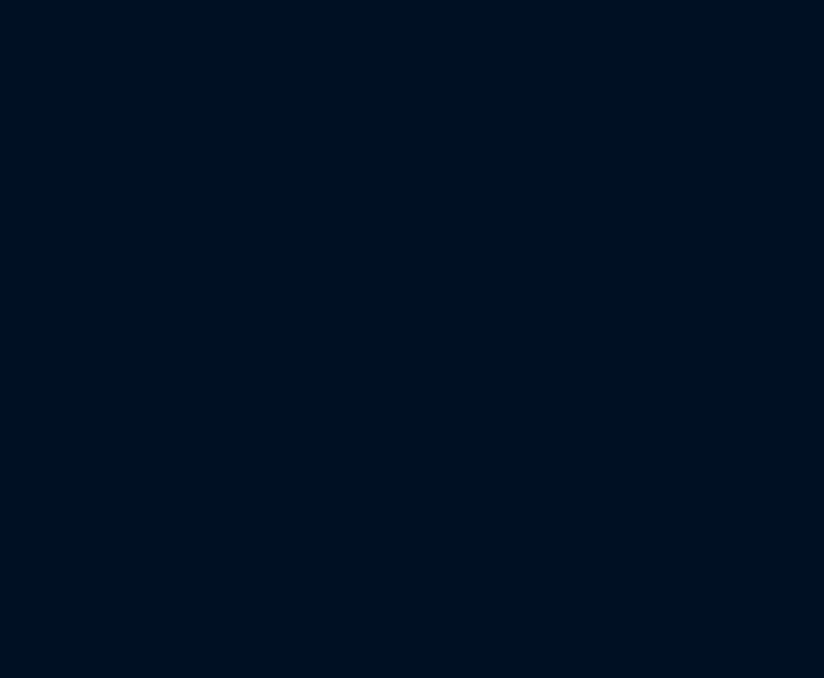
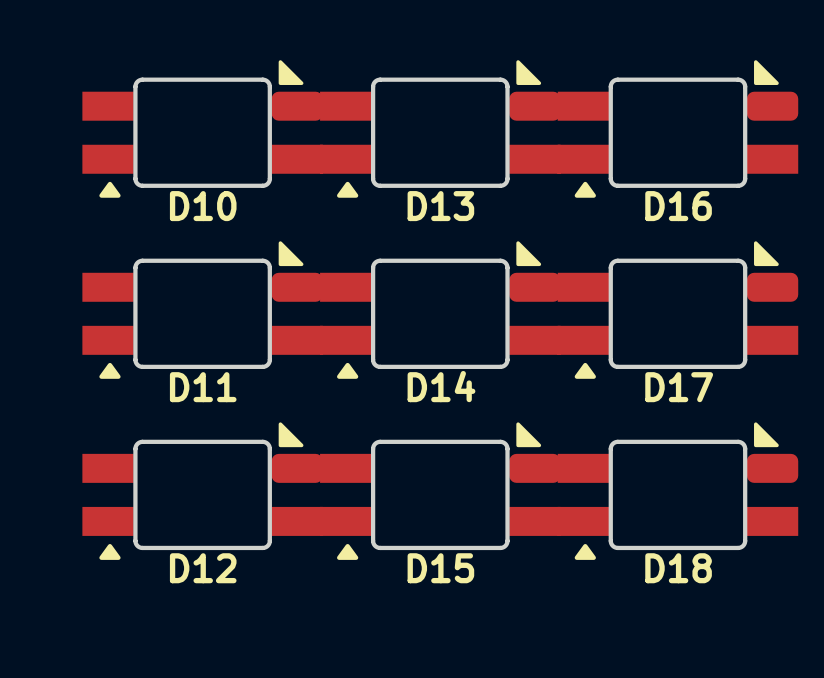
D10: none -> (202, 128)
D13: none -> (440, 128)
D16: none -> (677, 128)
D11: none -> (202, 310)
D14: none -> (440, 310)
D17: none -> (677, 310)
D12: none -> (202, 491)
D15: none -> (440, 491)
D18: none -> (677, 491)

